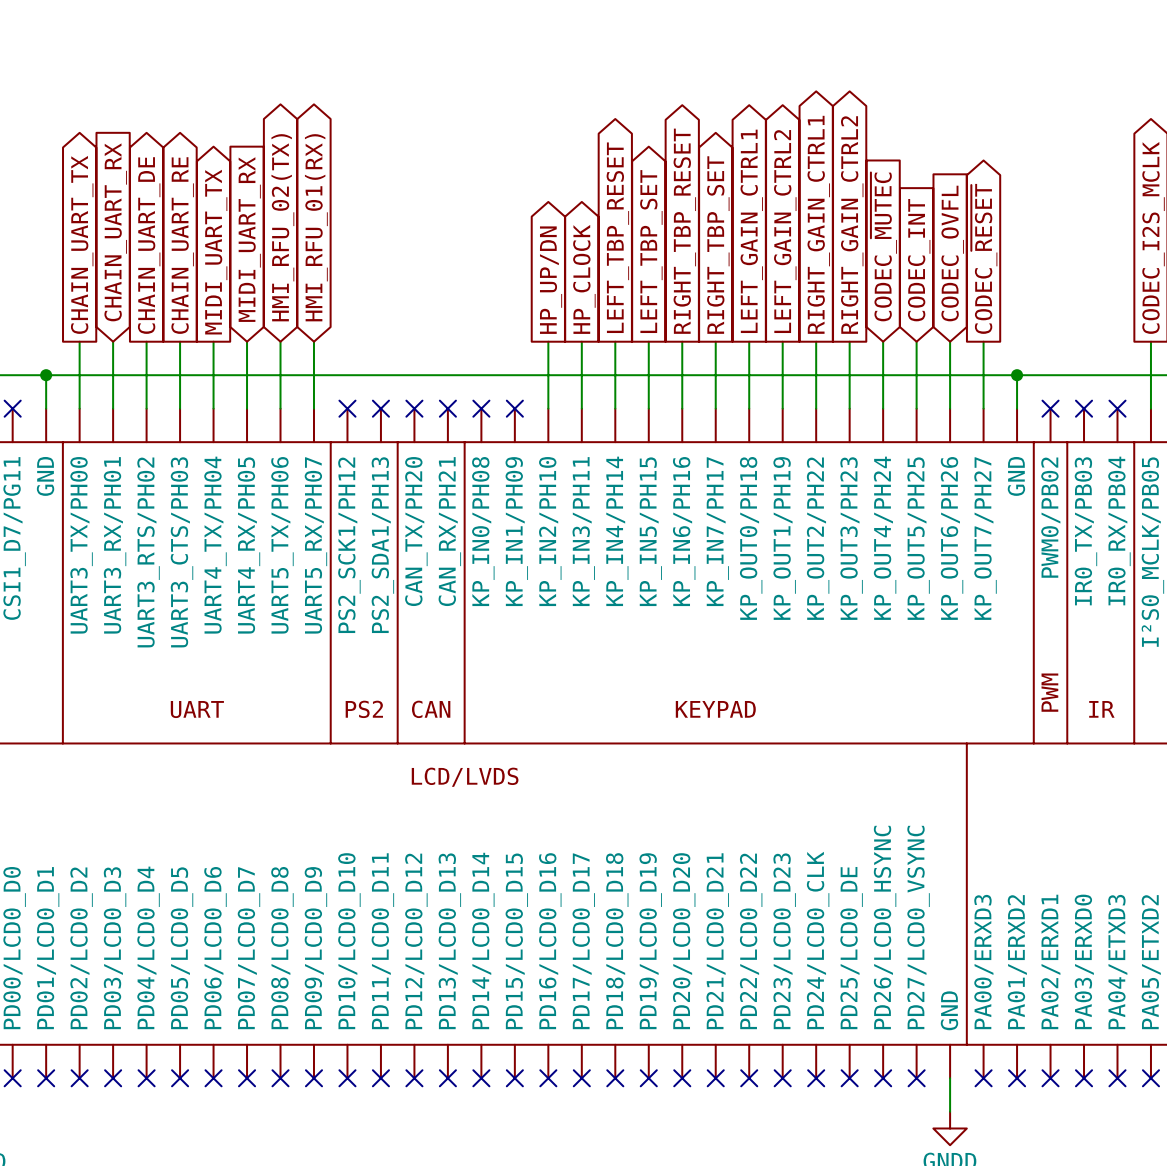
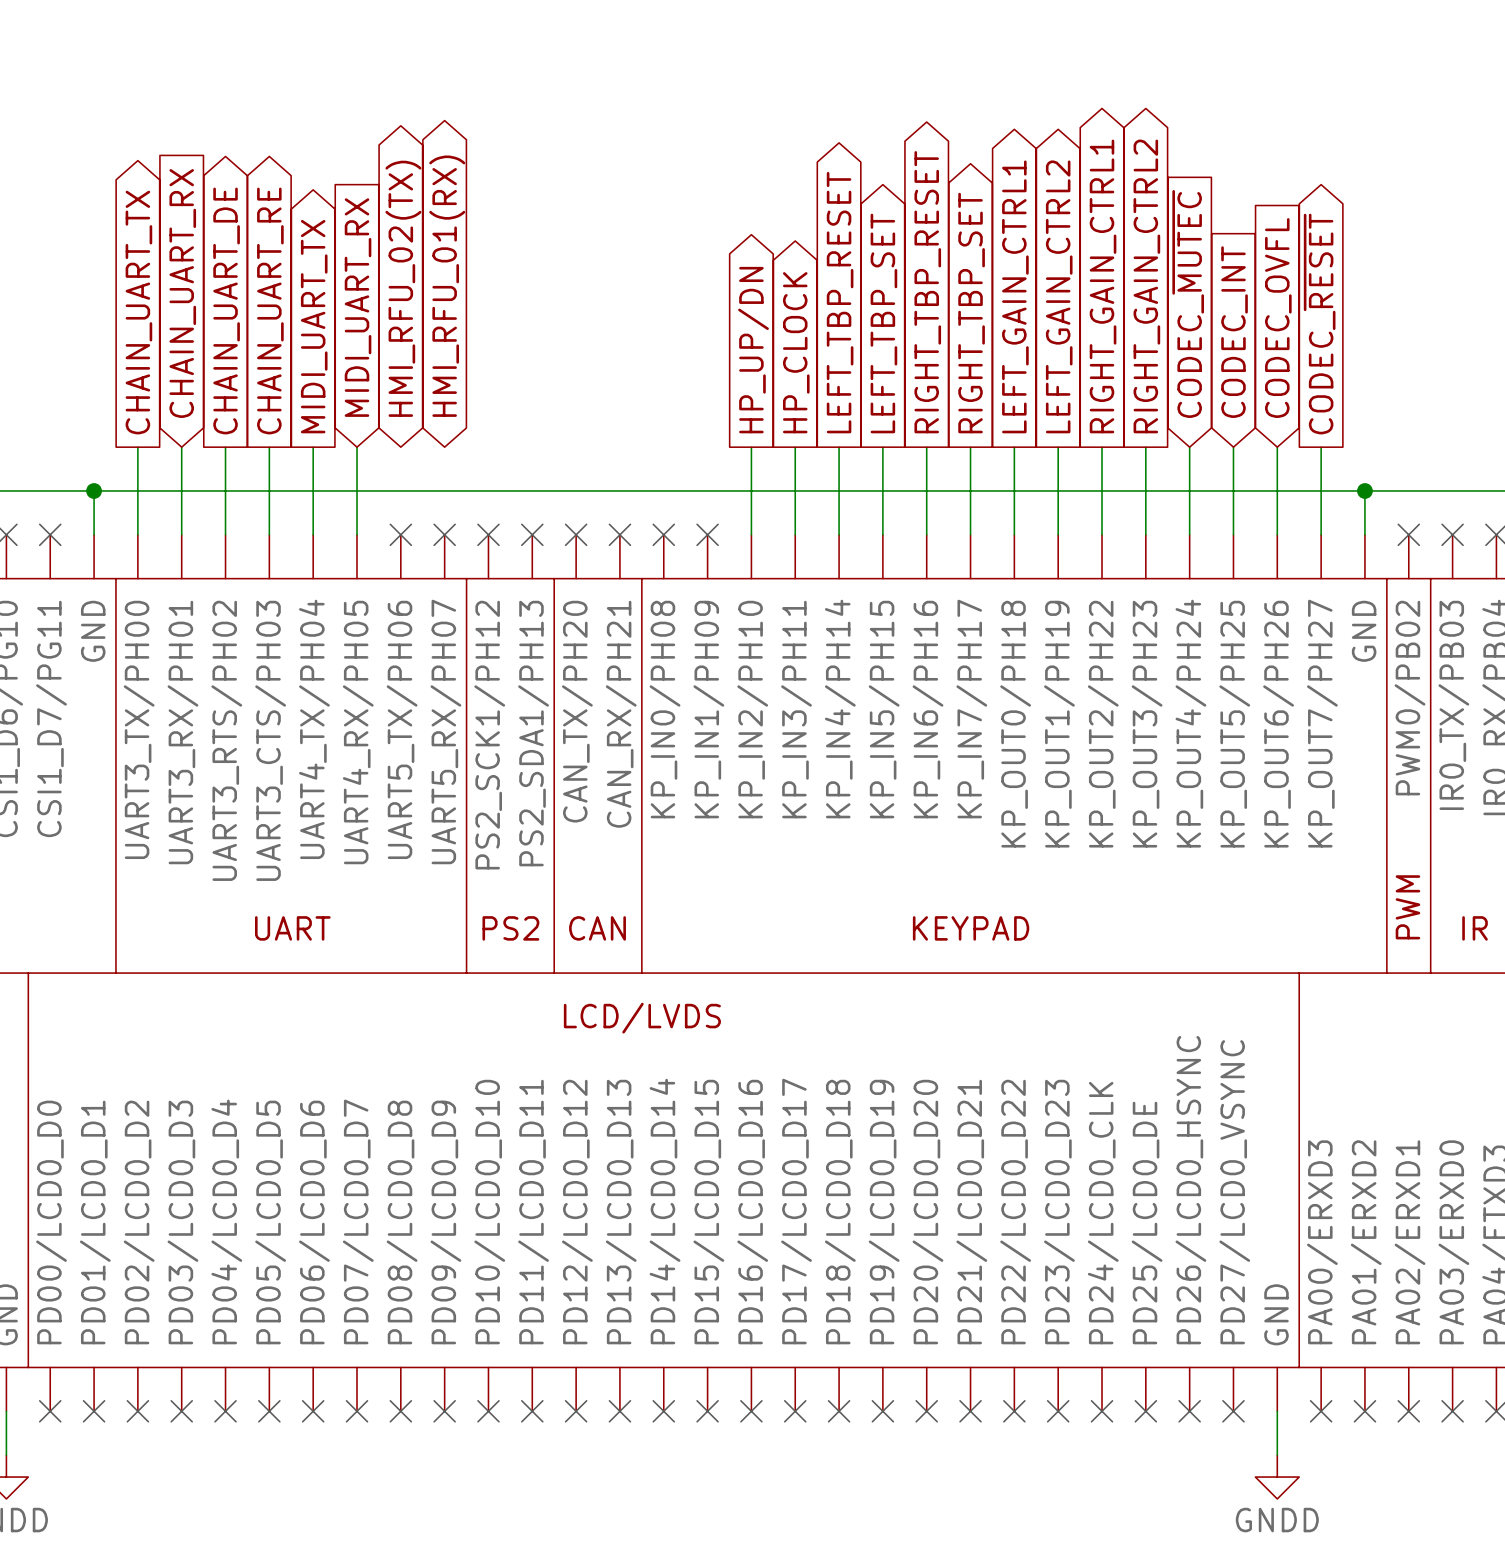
wire: (280, 341) (280, 408) -> none
wire: (313, 341) (313, 408) -> none
no-connect mark: none -> (400, 534)
no-connect mark: none -> (444, 534)

